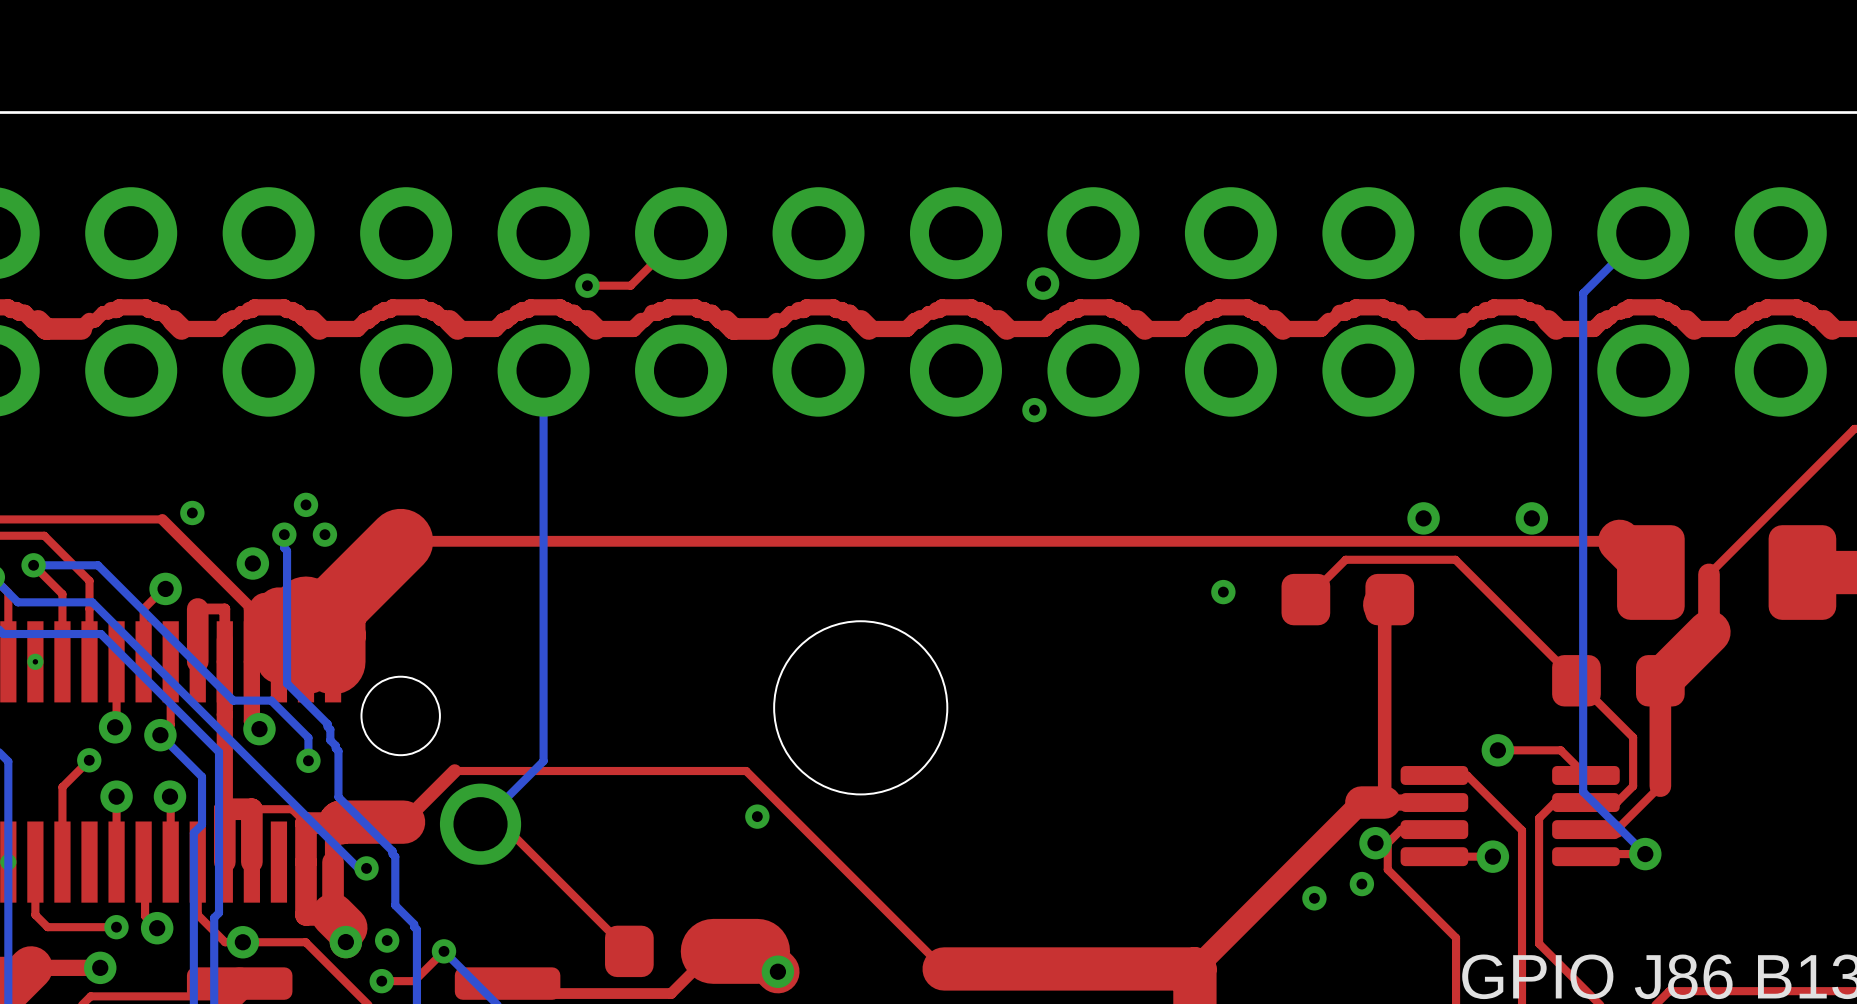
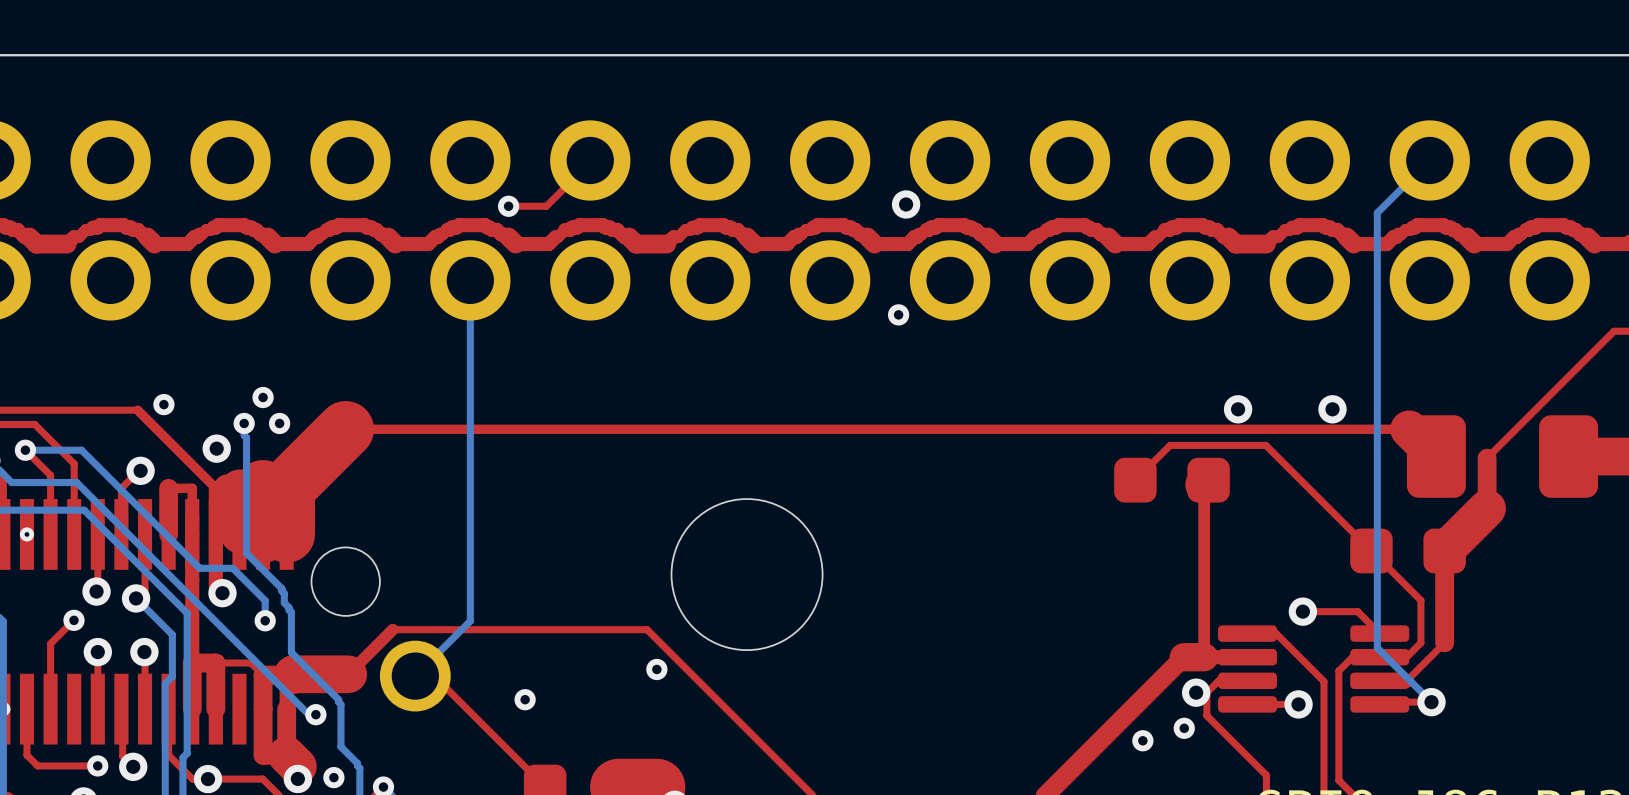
via: (1223, 592) -> none
via: none -> (525, 699)

